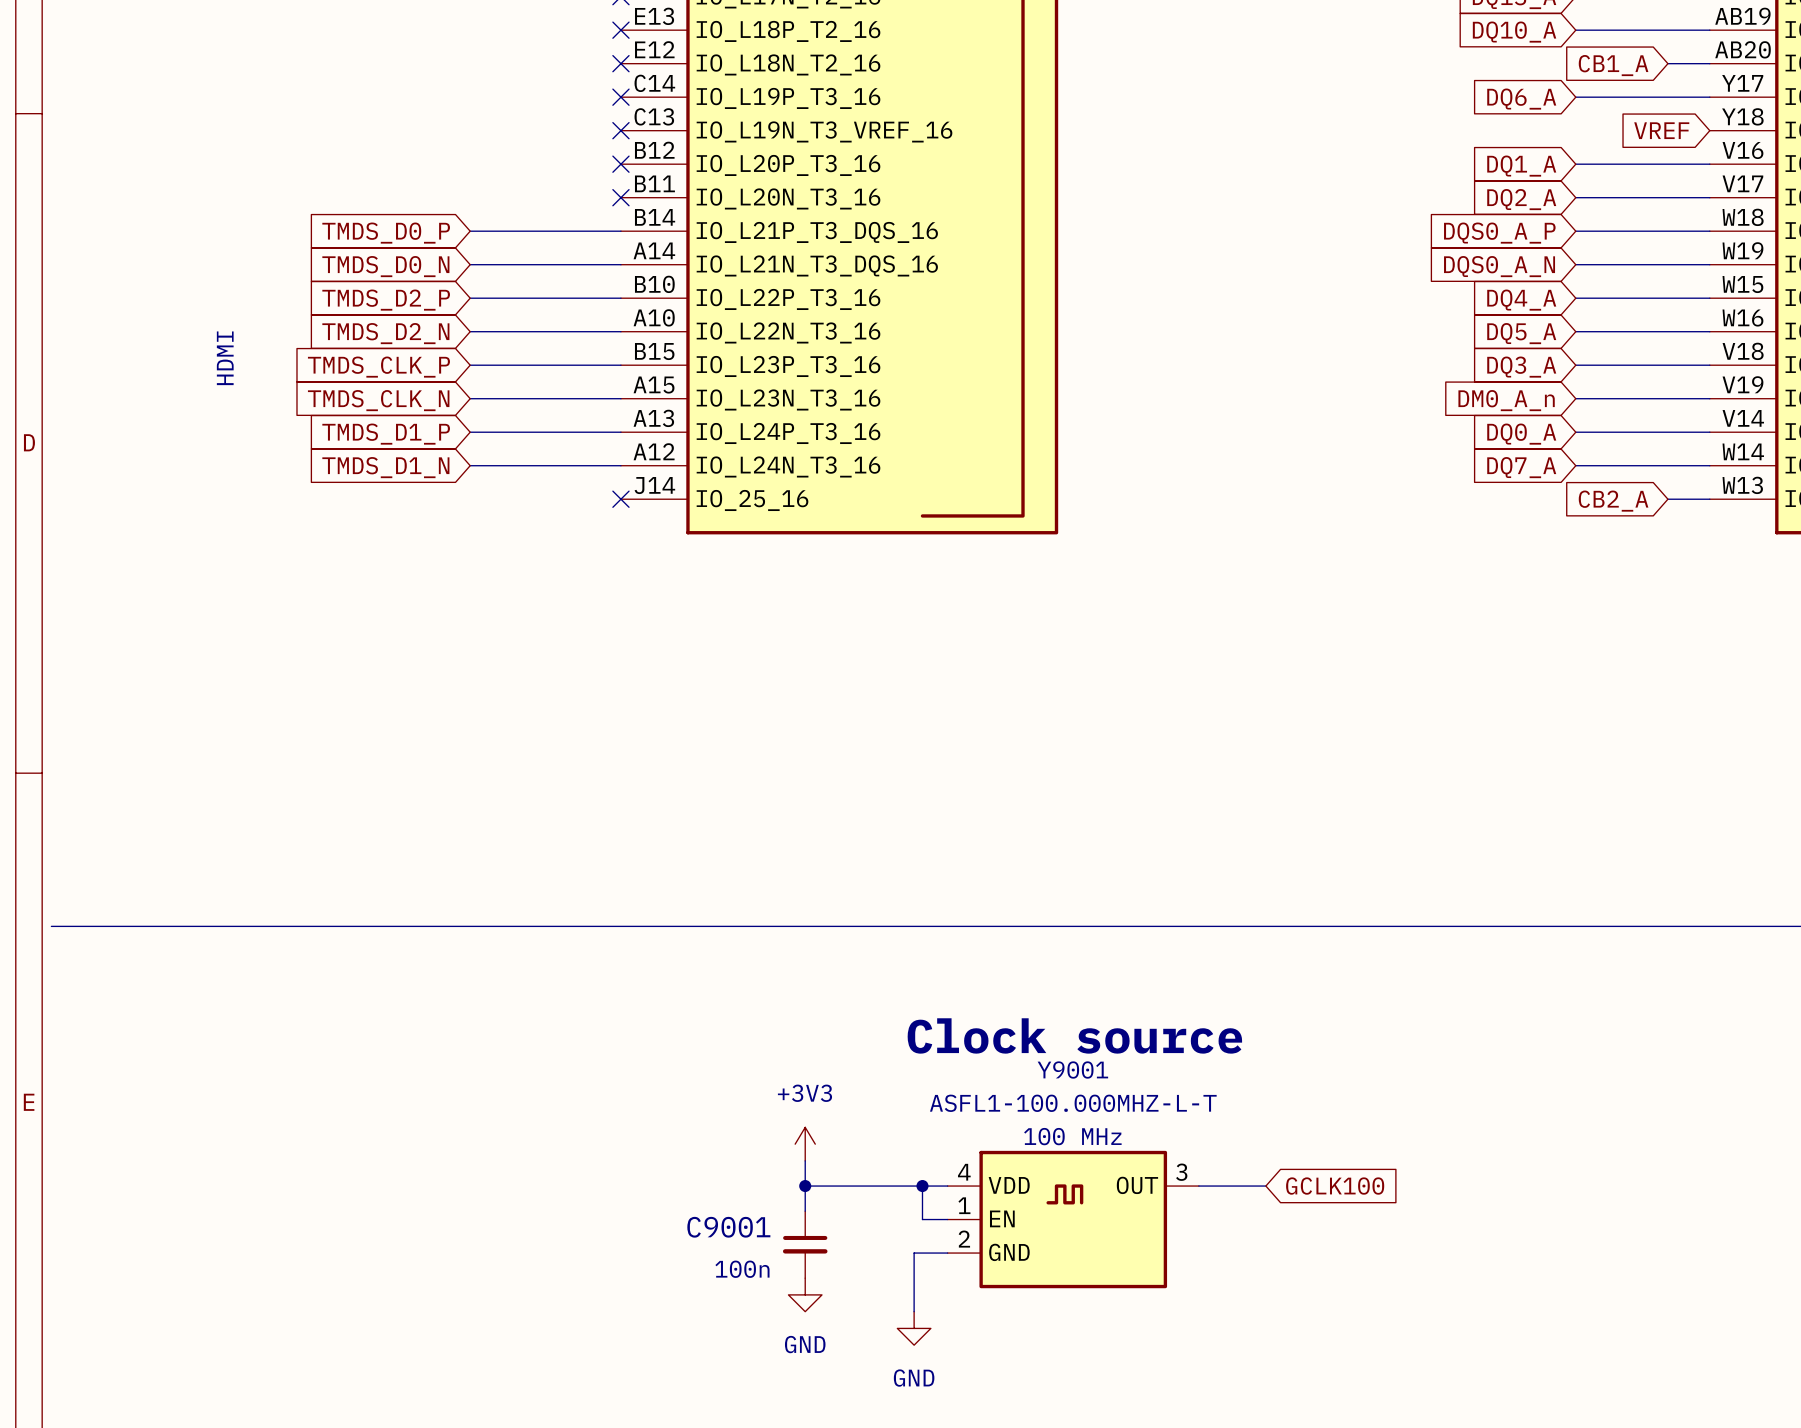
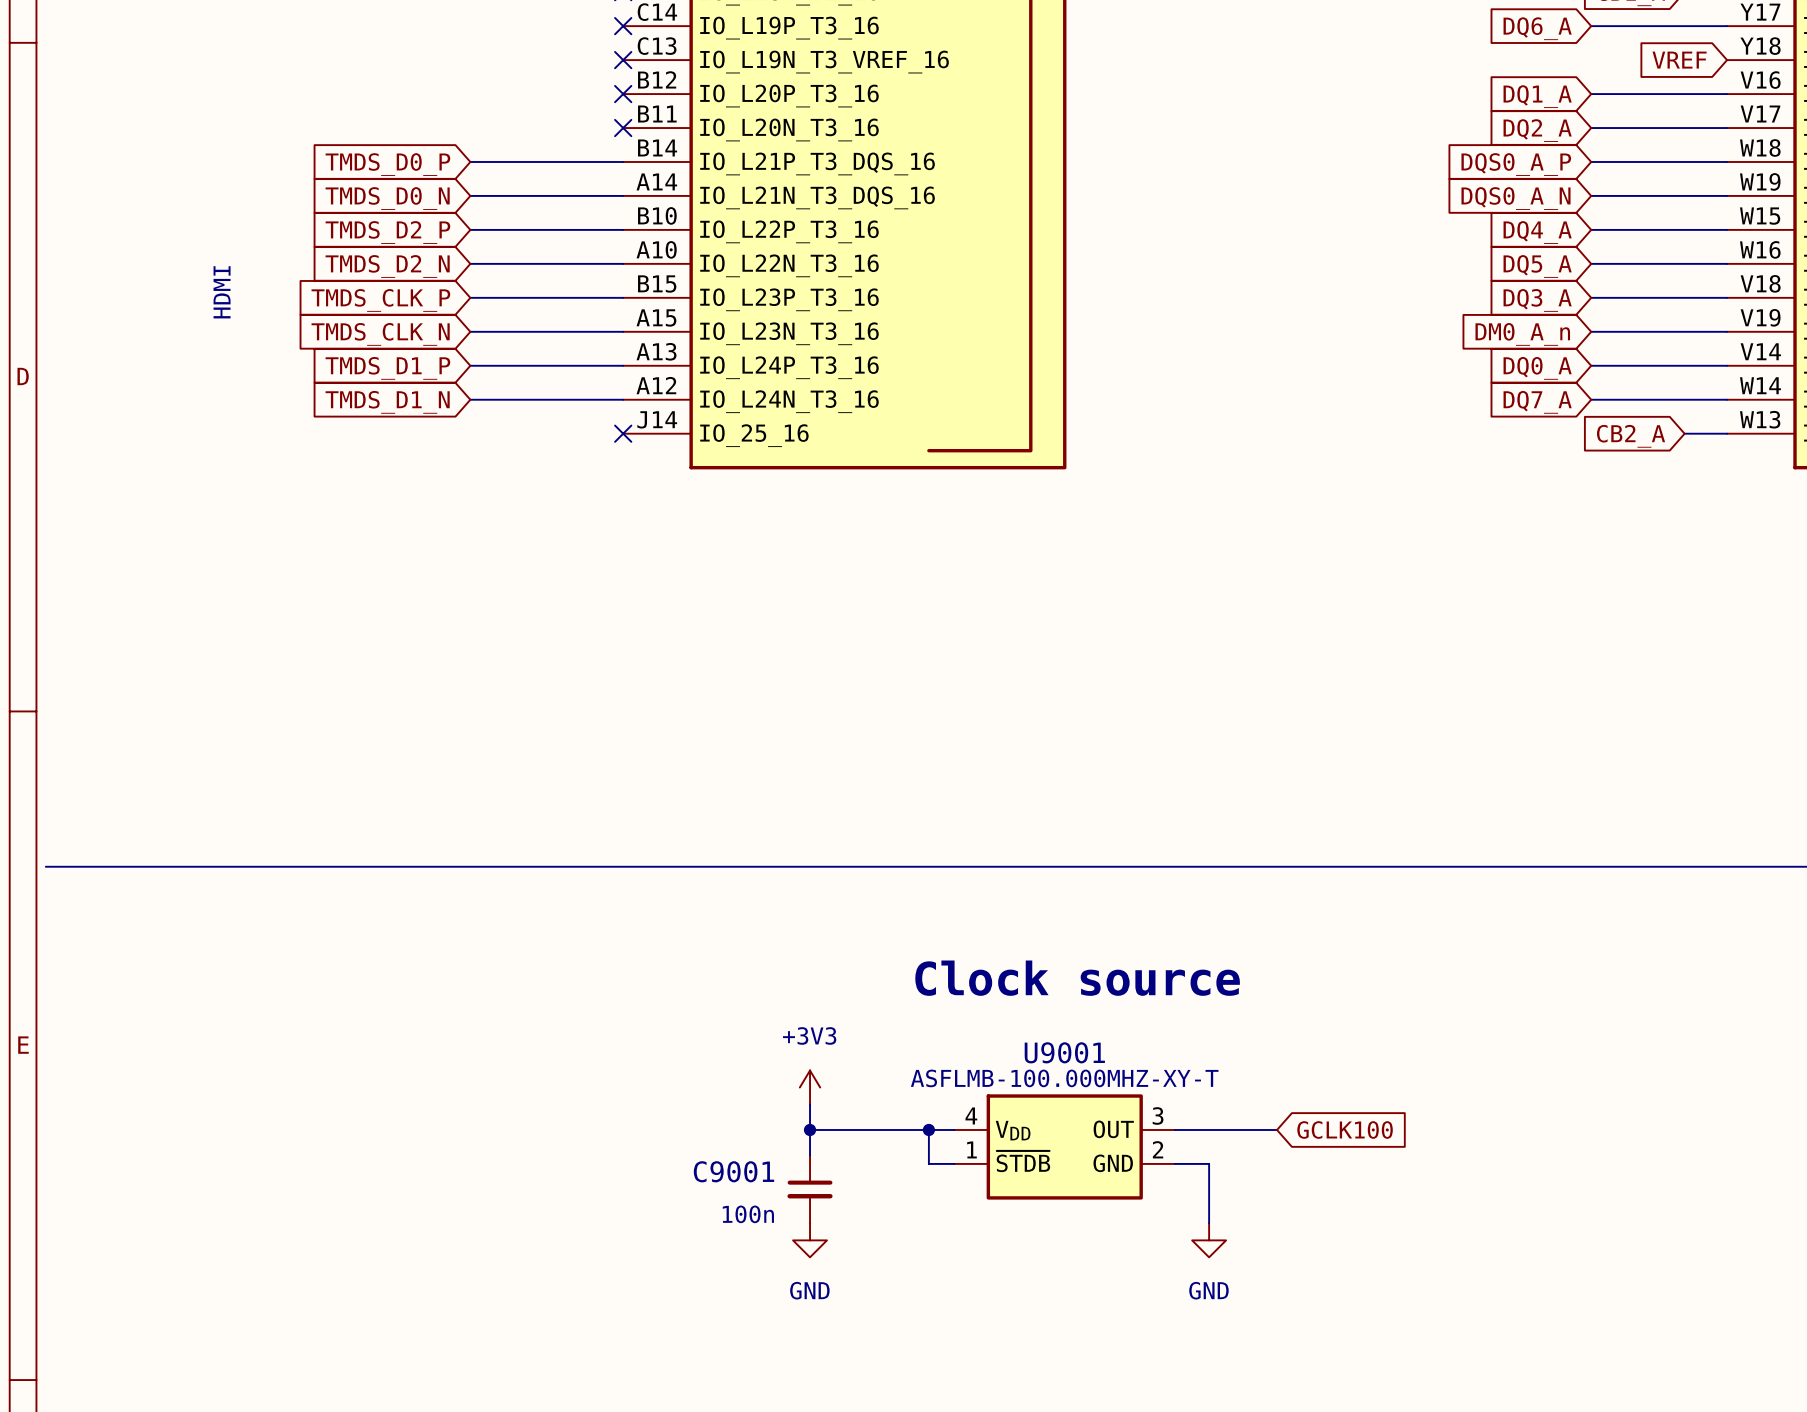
U9001: none -> (1064, 1146)
Y9001: (1073, 1219) -> none
wire: none -> (1175, 1163) (1209, 1163) (1209, 1223)
wire: (947, 1253) (914, 1253) (914, 1311) -> none
power symbol position: GND (914, 1328) -> GND (1209, 1240)

